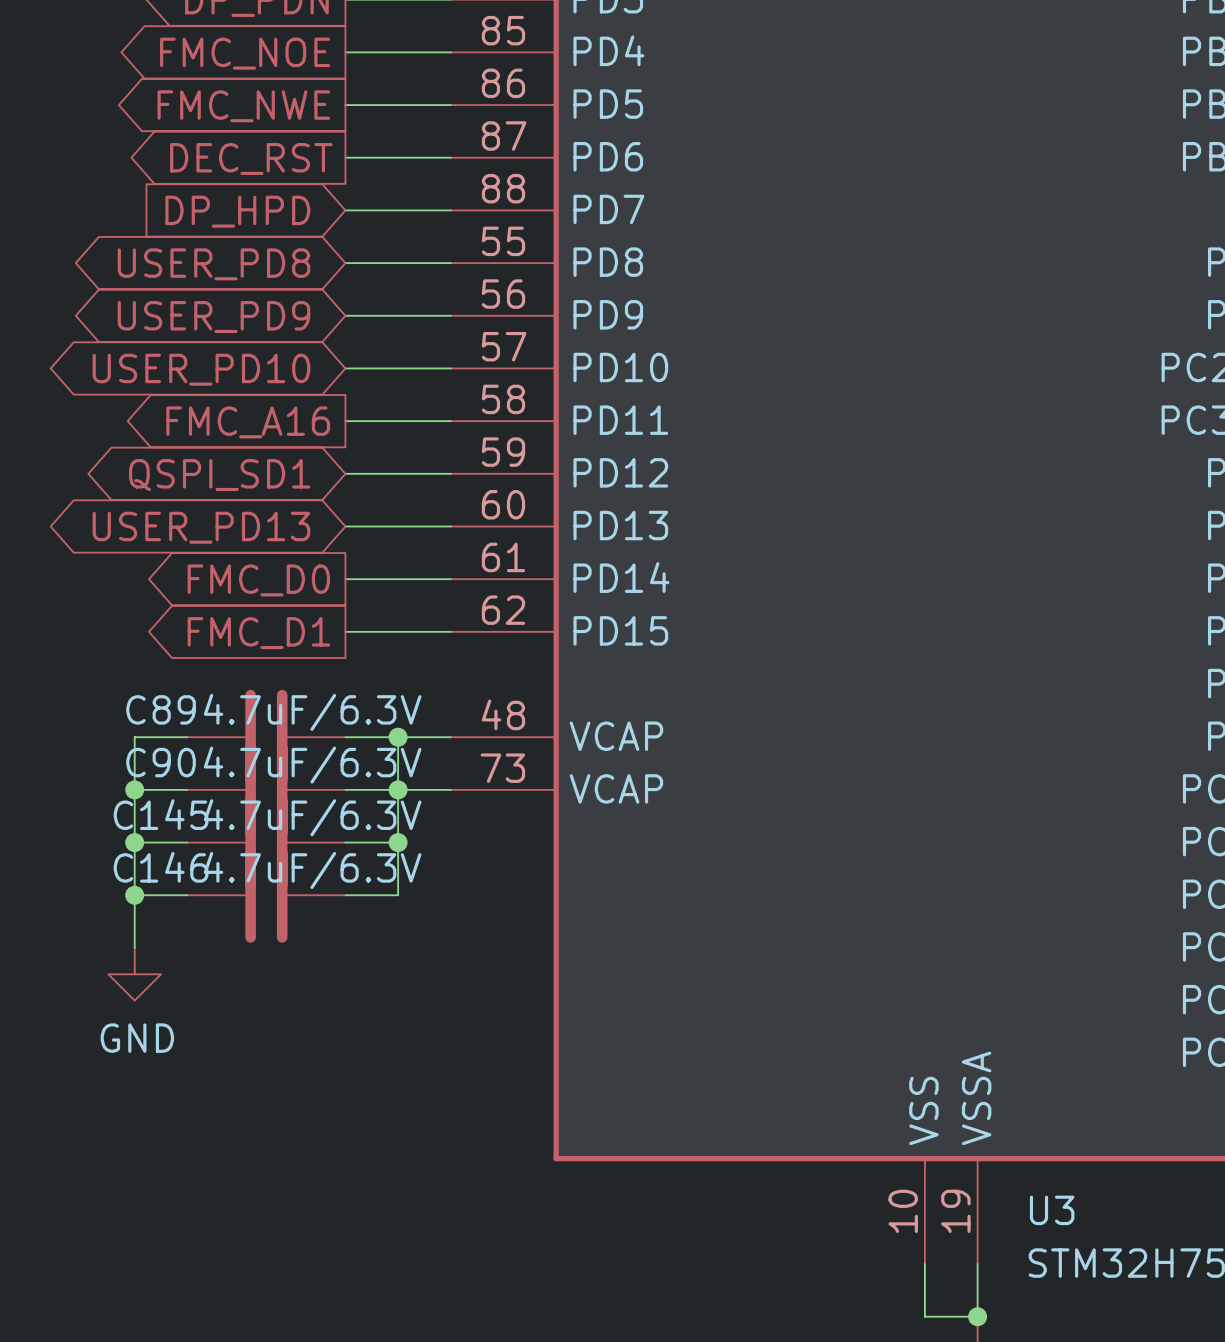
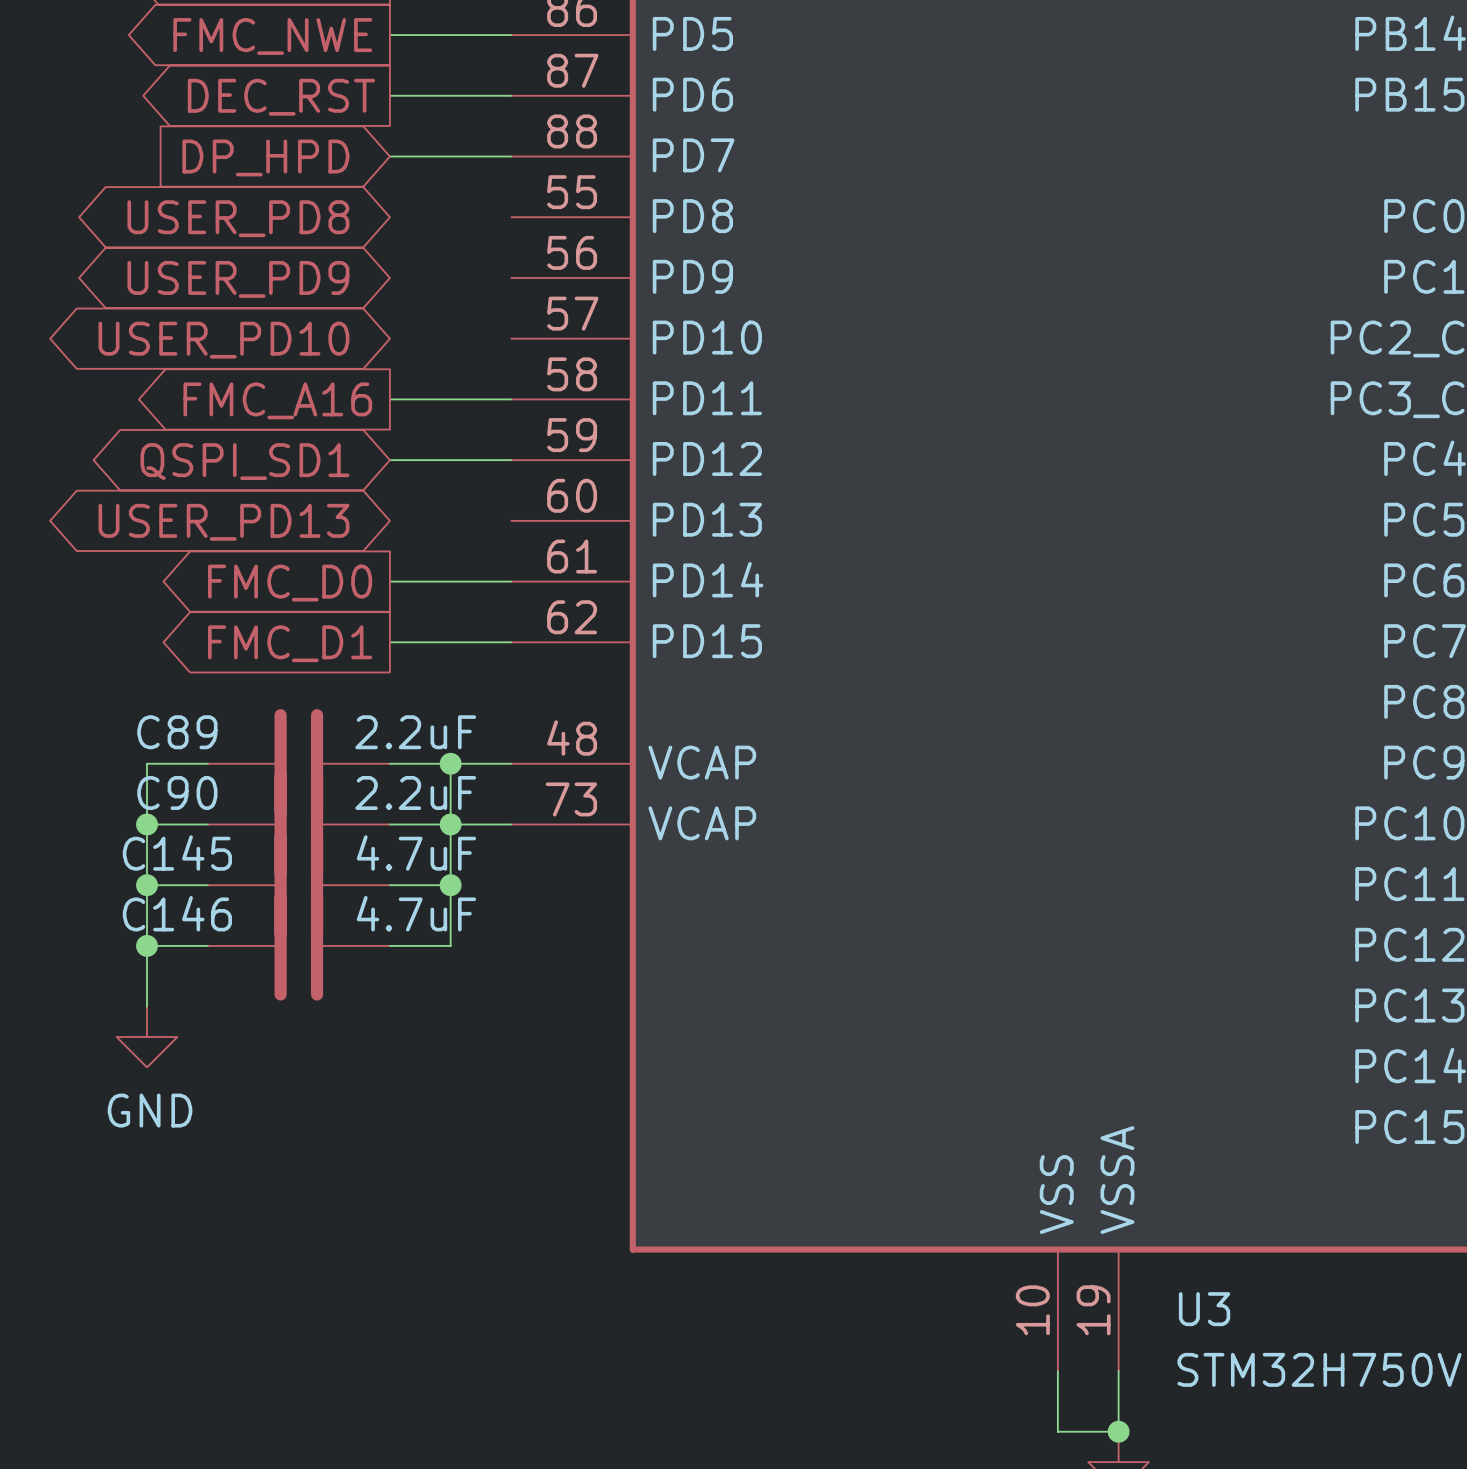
wire: (345, 263) (450, 263) -> none
wire: (345, 315) (450, 315) -> none
wire: (345, 368) (450, 368) -> none
wire: (345, 526) (450, 526) -> none
C89 value: 4.7uF/6.3V (312, 712) -> 2.2uF (415, 732)
C90 value: 4.7uF/6.3V (312, 765) -> 2.2uF (415, 792)
C145 value: 4.7uF/6.3V (312, 817) -> 4.7uF (416, 852)
C146 value: 4.7uF/6.3V (312, 870) -> 4.7uF (416, 913)

